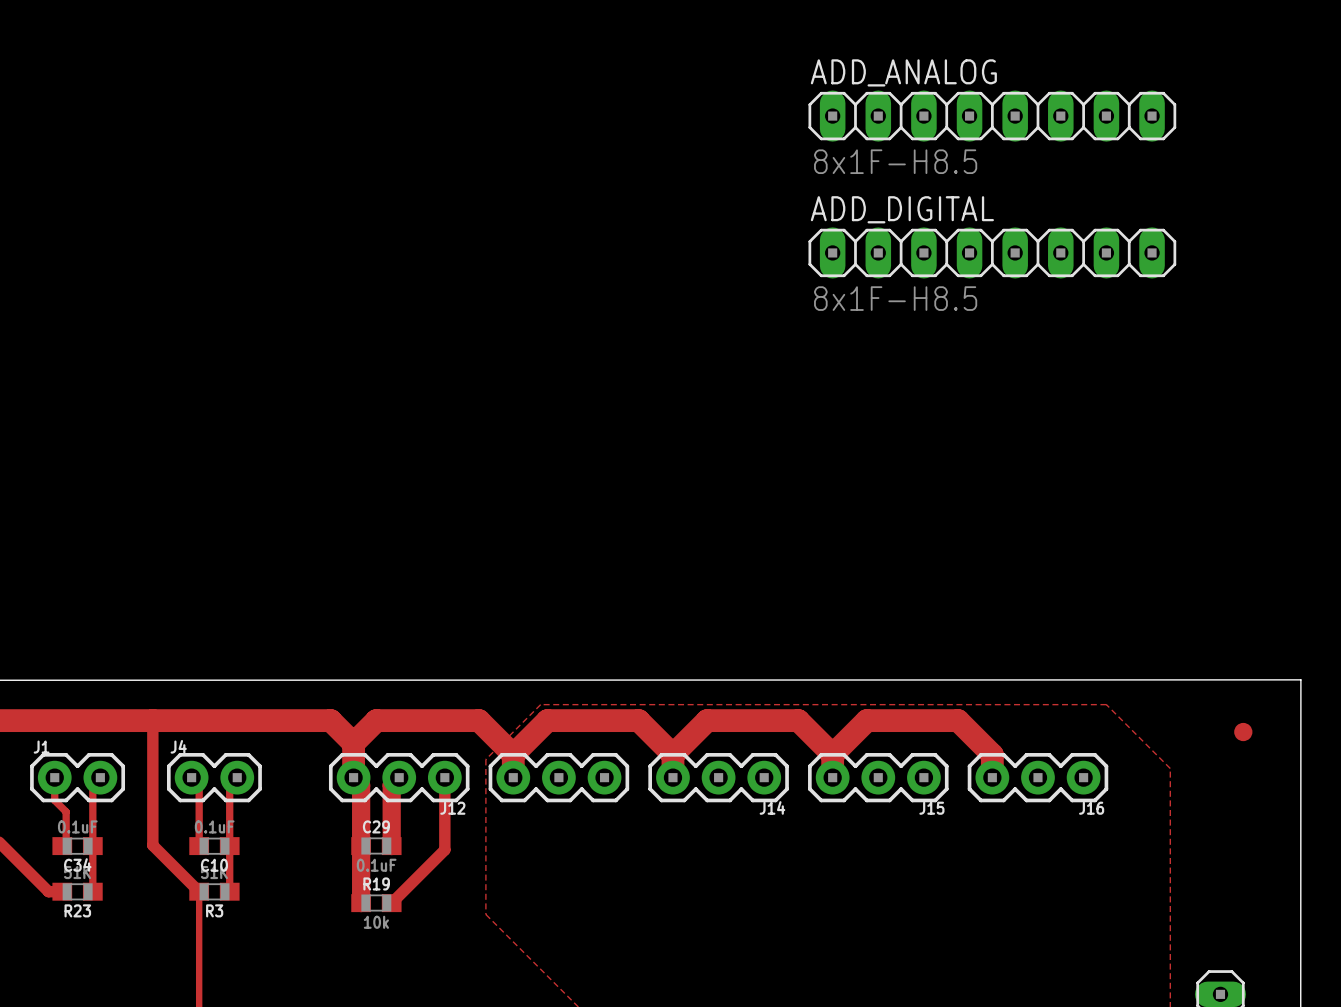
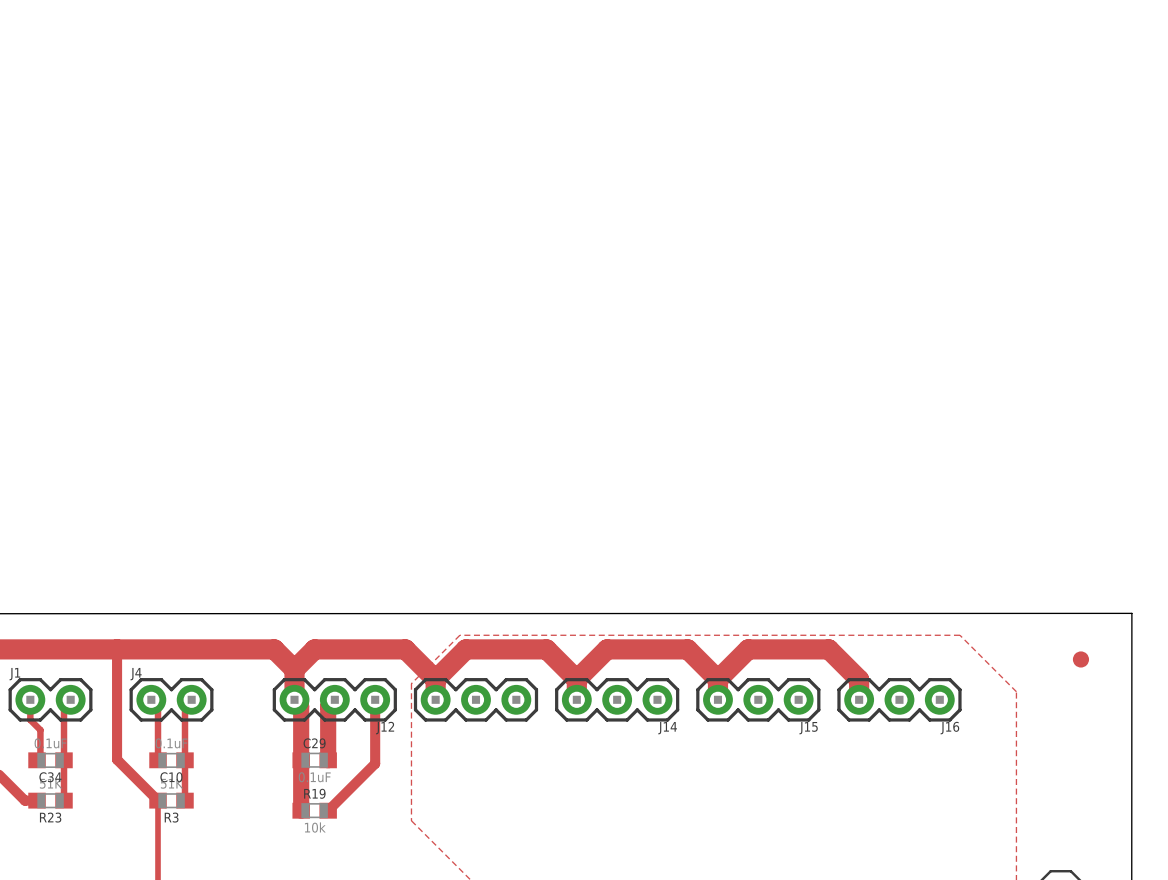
ADD_ANALOG: 8x1F-H8.5 (992, 116) -> none
ADD_DIGITAL: 8x1F-H8.5 (992, 252) -> none

